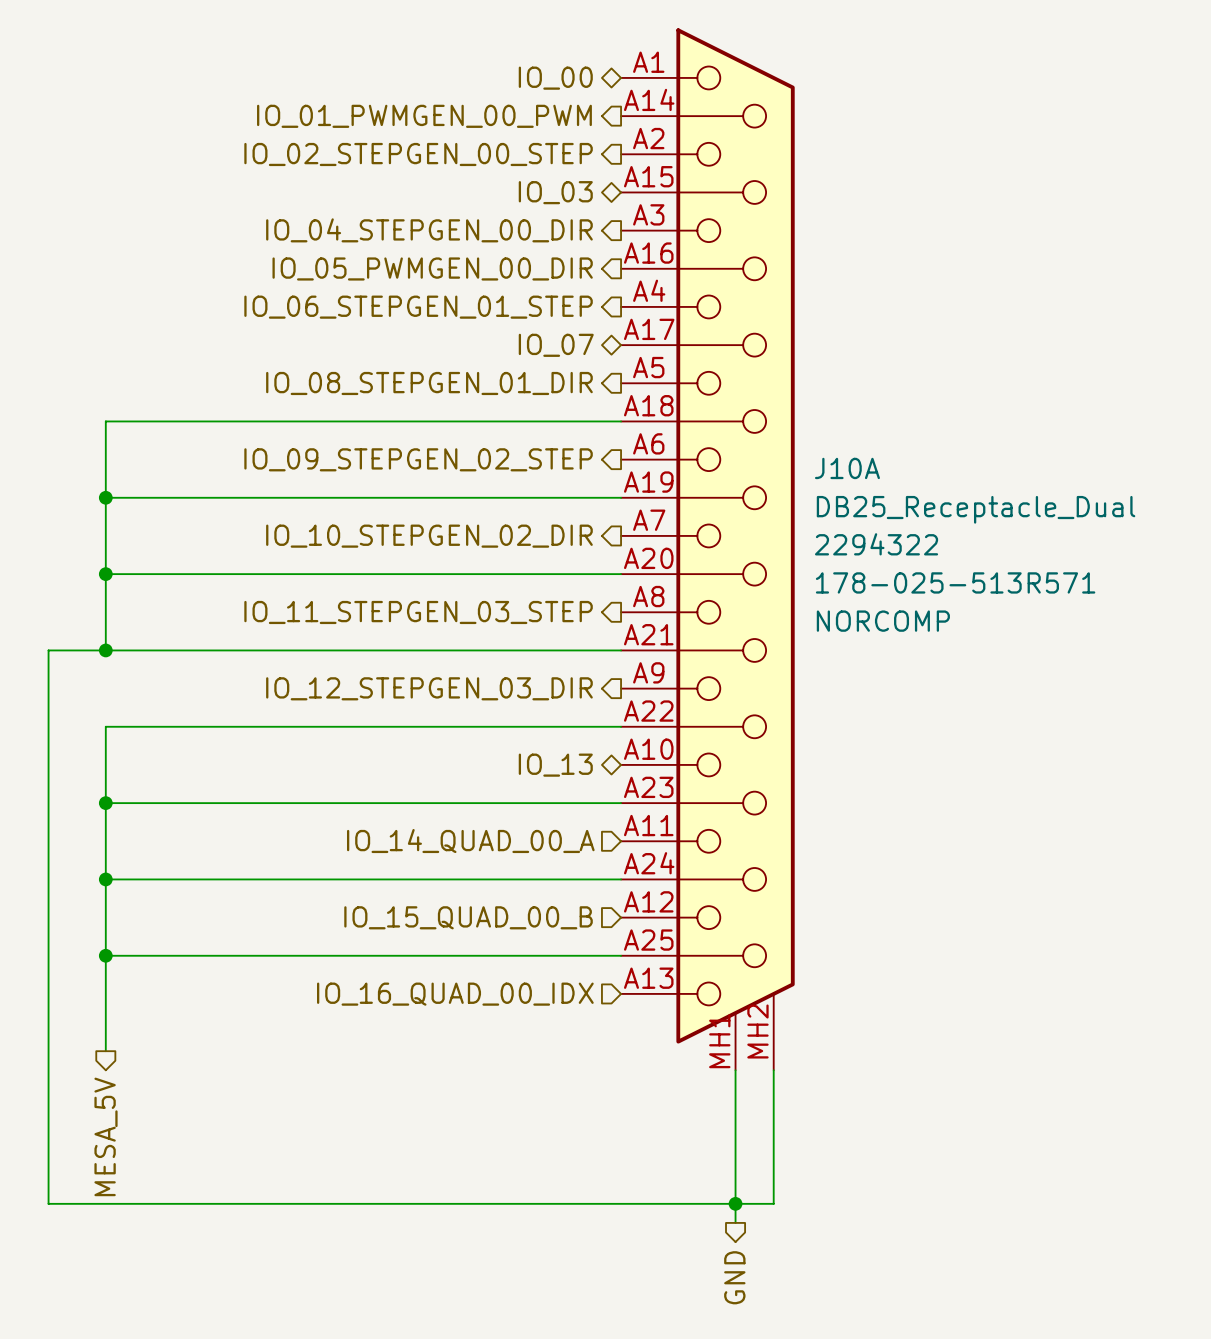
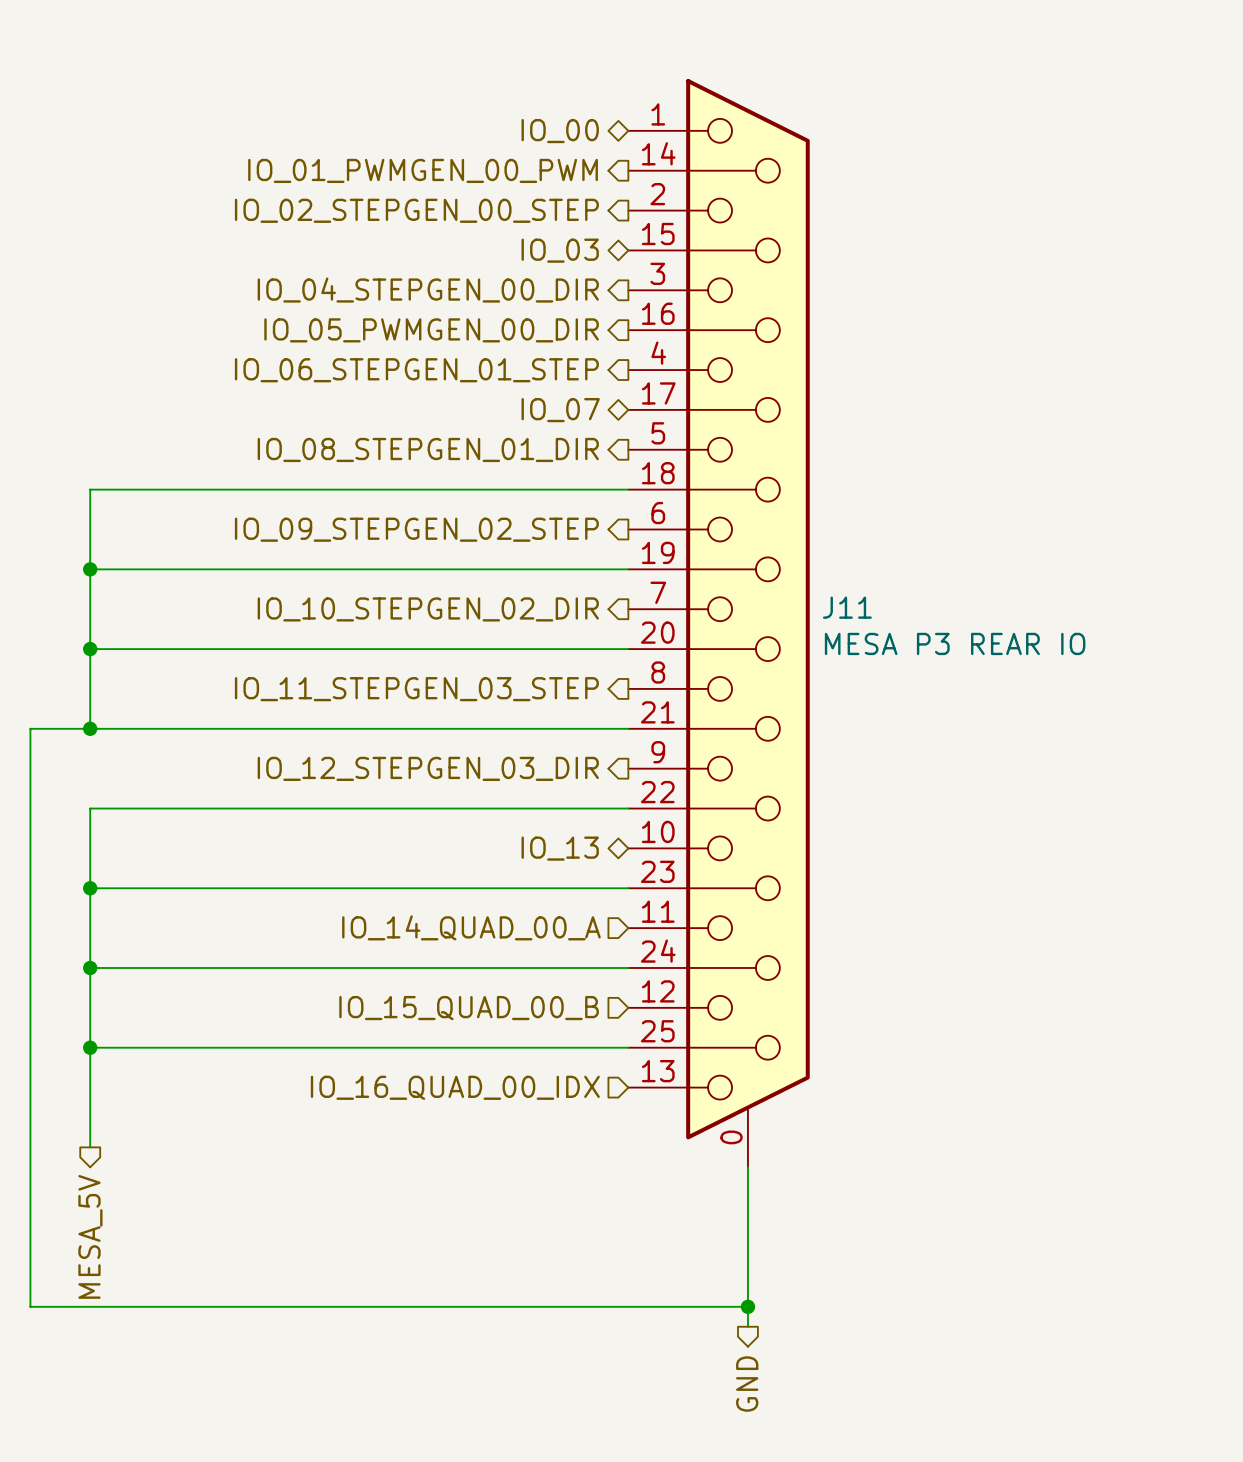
J10A: DB25_Receptacle_Dual (707, 549) -> none
J11: none -> MESA P3 REAR IO (719, 623)
wire: (773, 1070) (773, 1203) (735, 1203) -> none

